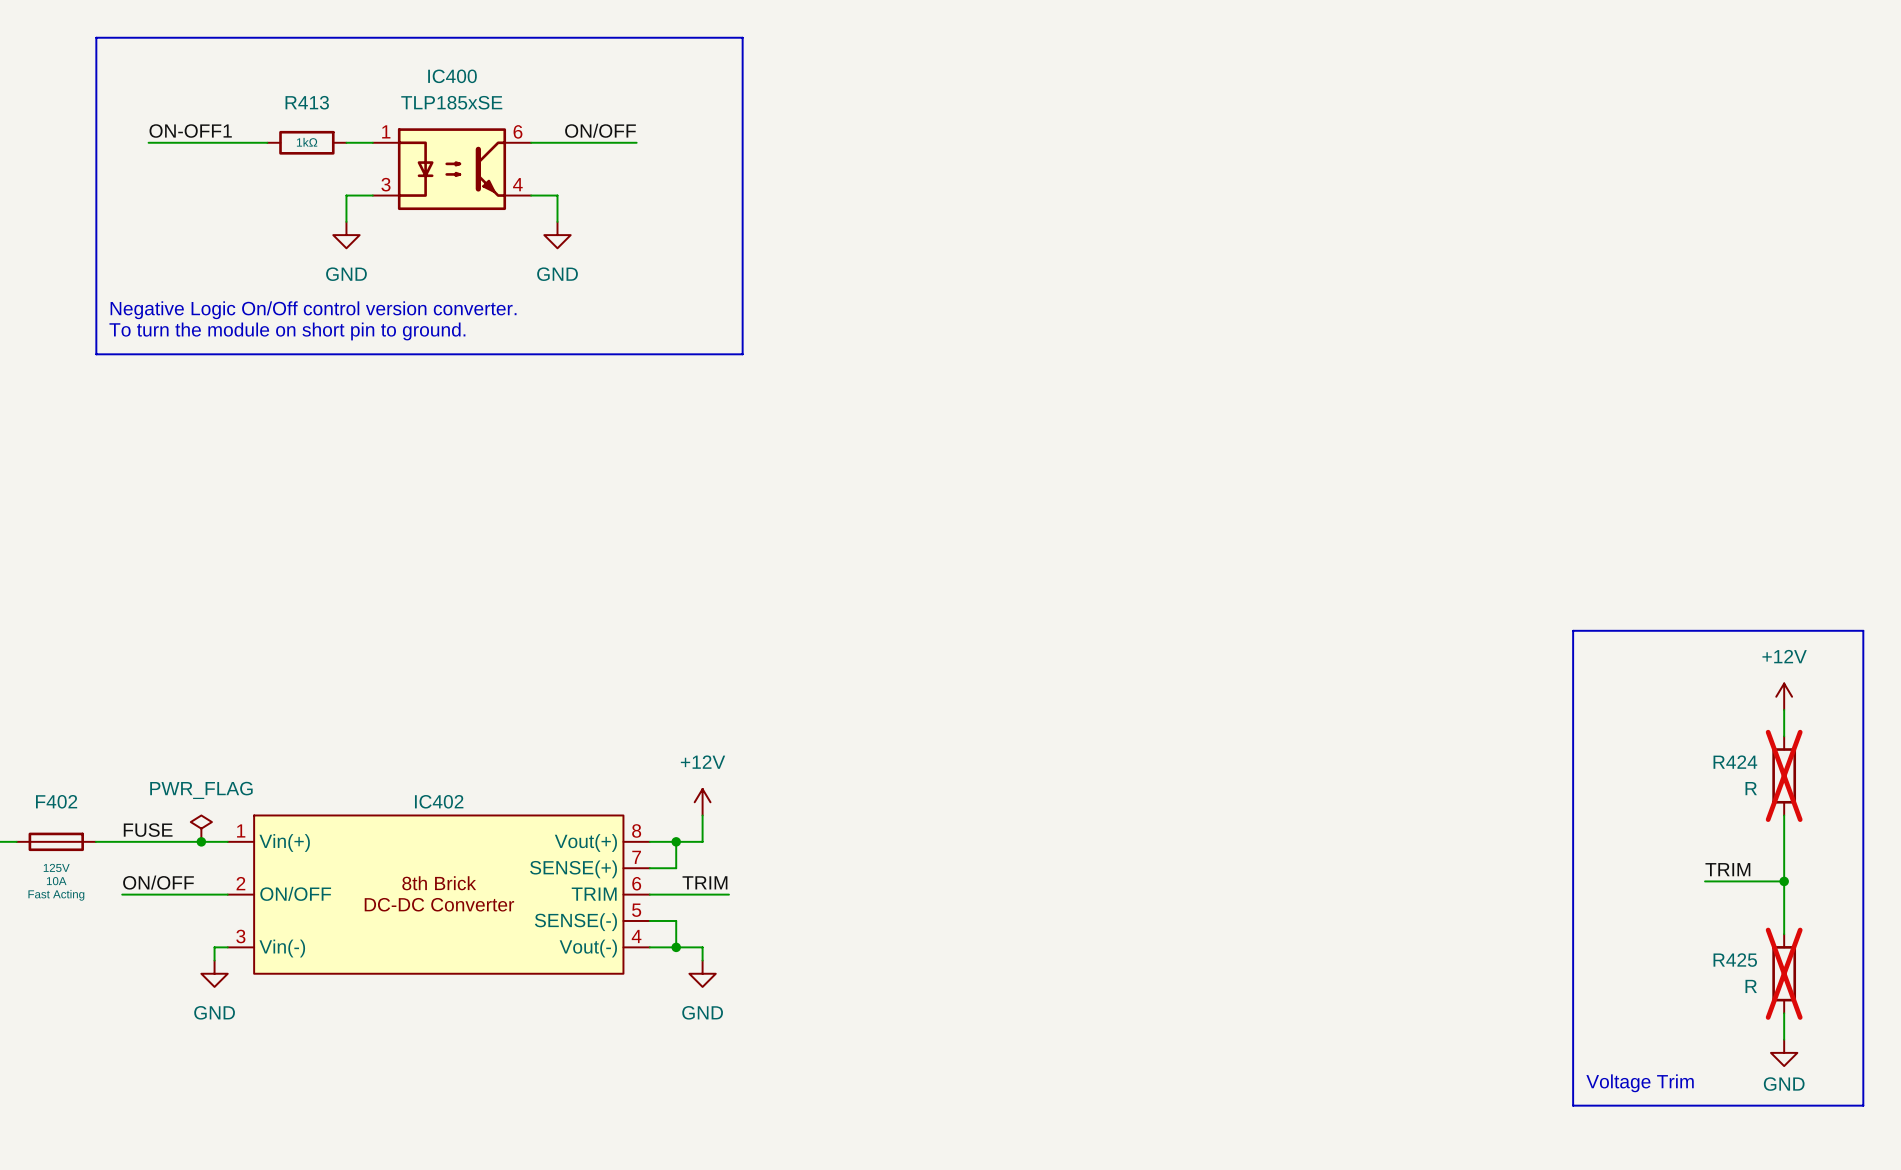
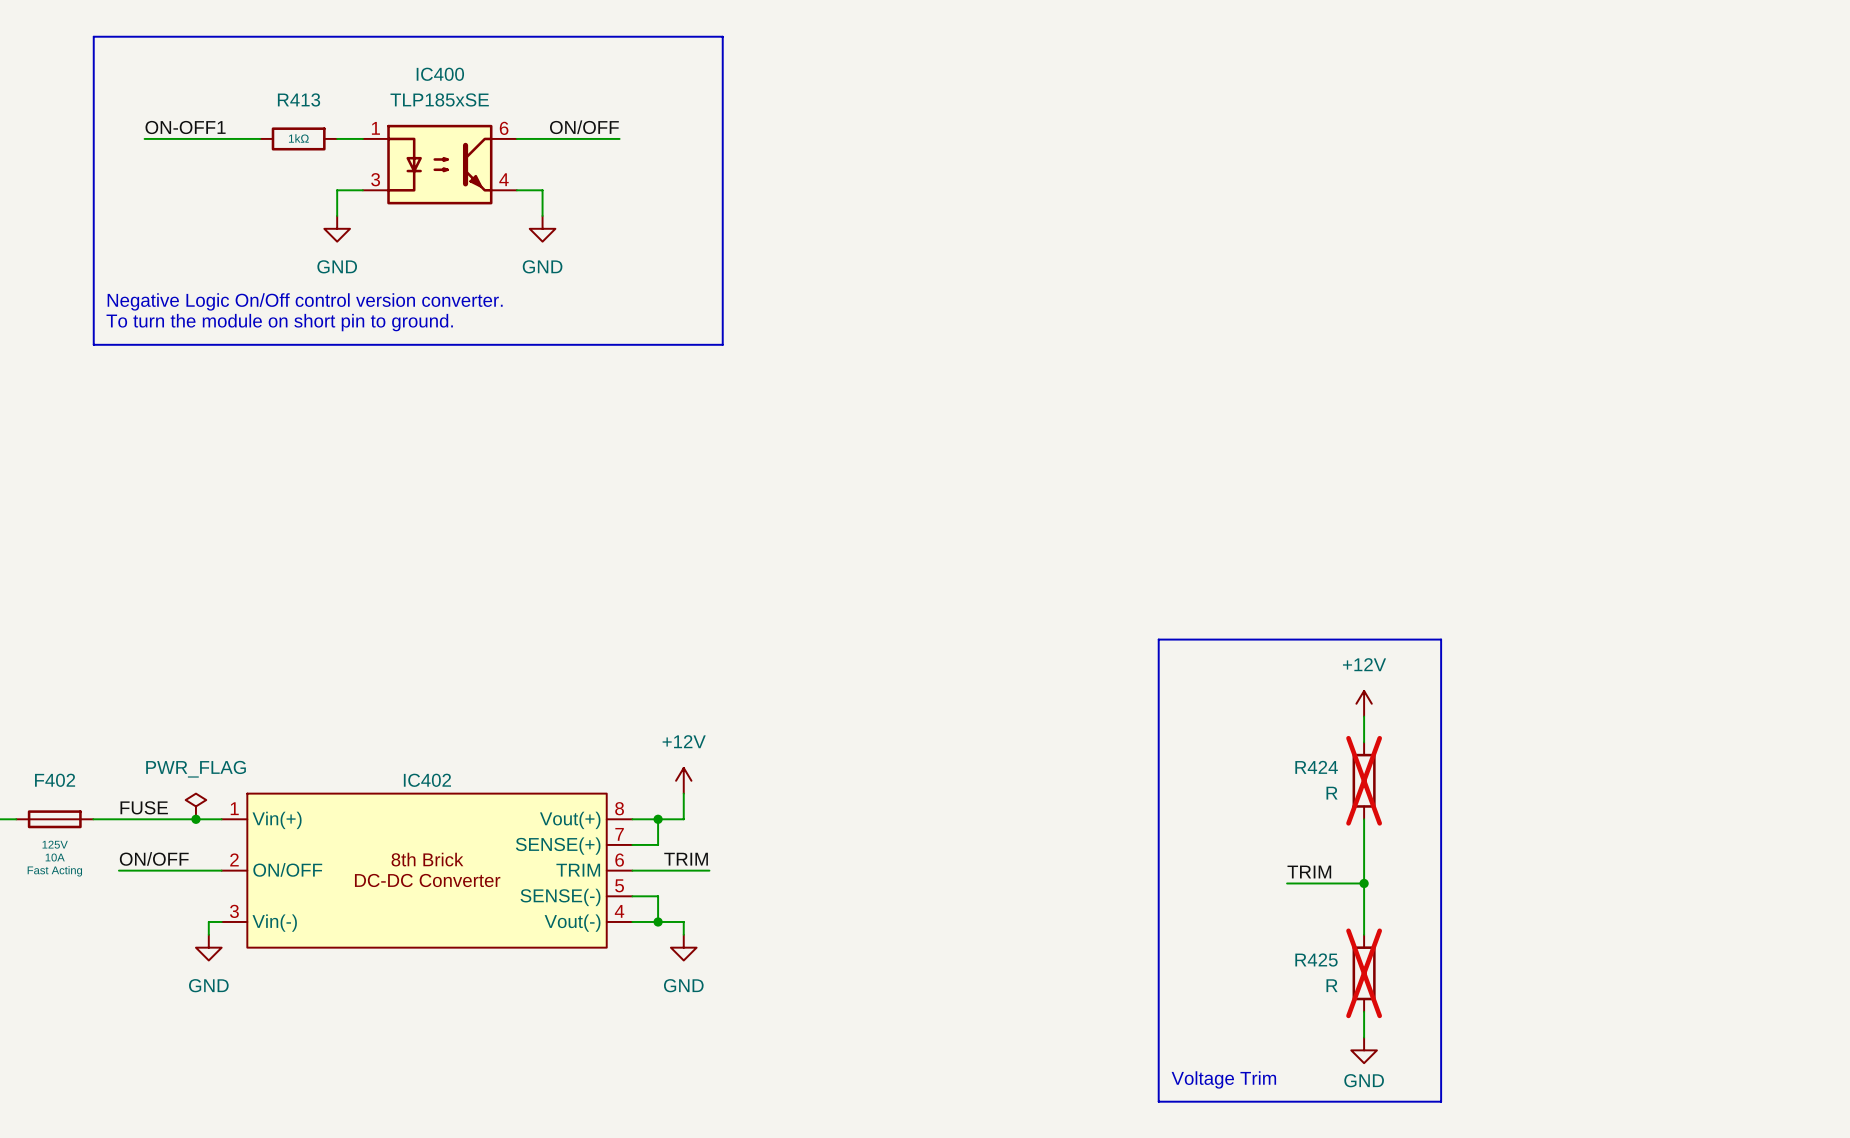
line: (1573, 630) (1863, 630) (1863, 1105) (1573, 1105) (1573, 630) -> none
line: none -> (1158, 639) (1441, 639) (1441, 1101) (1158, 1101) (1158, 639)
power symbol: +12V (1784, 696) -> none
wire: (1784, 709) (1784, 736) -> none
power symbol: none -> +12V (1364, 703)
wire: none -> (1364, 716) (1364, 742)
R424 position: (1784, 775) -> (1364, 780)
wire: (1784, 815) (1784, 934) -> none
wire: none -> (1364, 819) (1364, 934)
label: TRIM (1727, 869) -> none
wire: (1705, 881) (1784, 881) -> none
junction: (1784, 881) -> none
label: none -> TRIM (1309, 872)
wire: none -> (1287, 883) (1364, 883)
junction: none -> (1364, 883)
R425 position: (1784, 973) -> (1364, 973)
wire: (1784, 1013) (1784, 1039) -> none
wire: none -> (1364, 1011) (1364, 1037)
power symbol: GND (1784, 1052) -> none
power symbol: none -> GND (1364, 1050)
text: Voltage Trim (1640, 1083) -> none
text: none -> Voltage Trim (1223, 1079)

